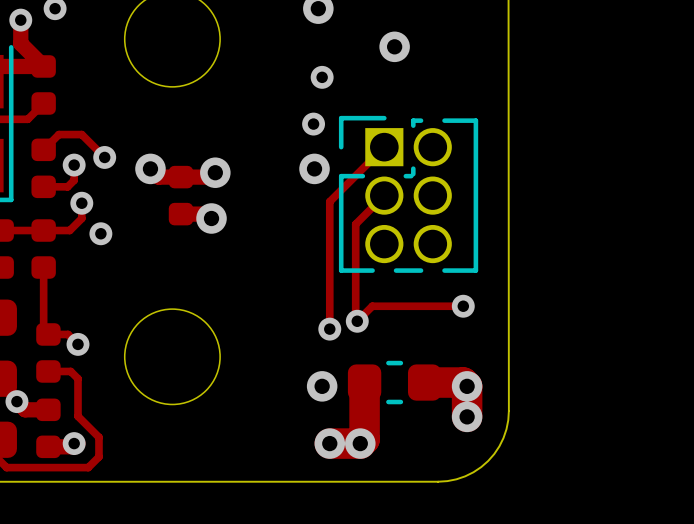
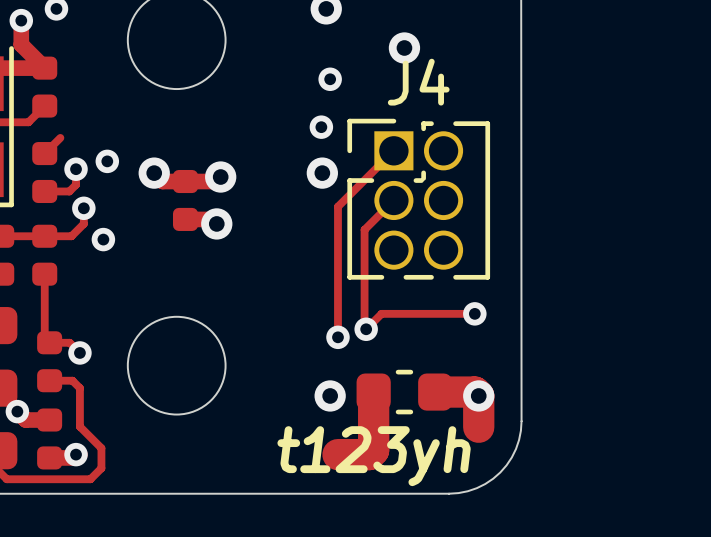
J4 name: none -> J4 (418, 82)
track: (58, 134) (81, 134) (104, 157) -> none
via: (467, 416) -> none
via: (329, 443) -> none
via: (360, 443) -> none
text: none -> t123yh (374, 456)

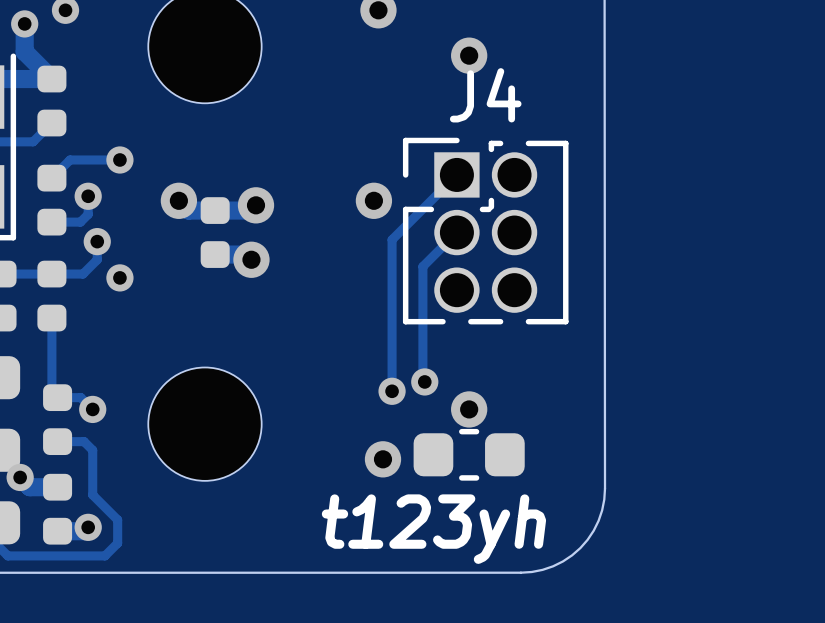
via: (330, 79) -> none
via: (321, 127) -> none
track: none -> (70, 159) (119, 159)
via position: (107, 161) -> (119, 159)
track: (474, 313) (381, 313) (366, 329) -> none
via: (474, 313) -> none
track: (373, 392) (373, 450) (369, 454) (337, 454) -> none
track: (435, 392) (474, 392) (478, 395) (478, 427) -> none
via position: (478, 395) -> (469, 409)

